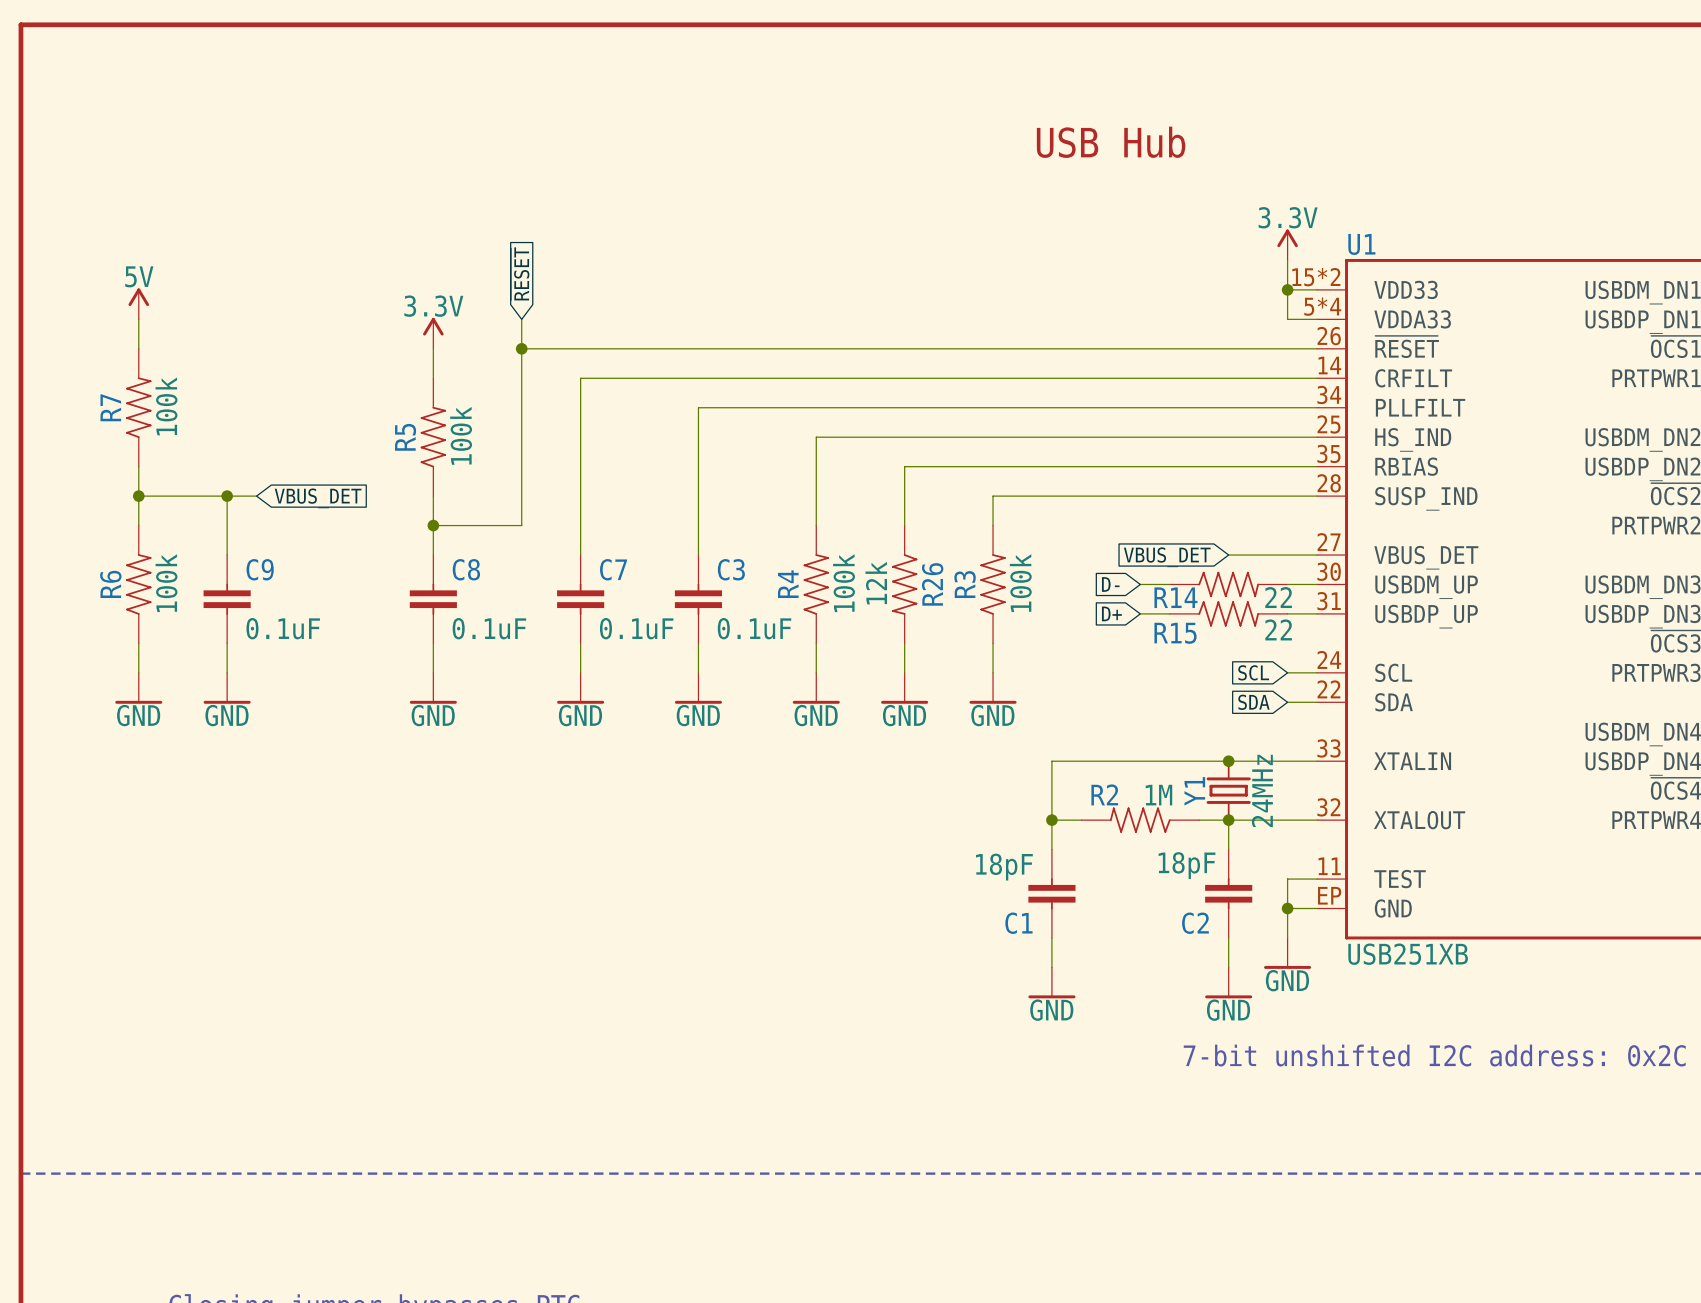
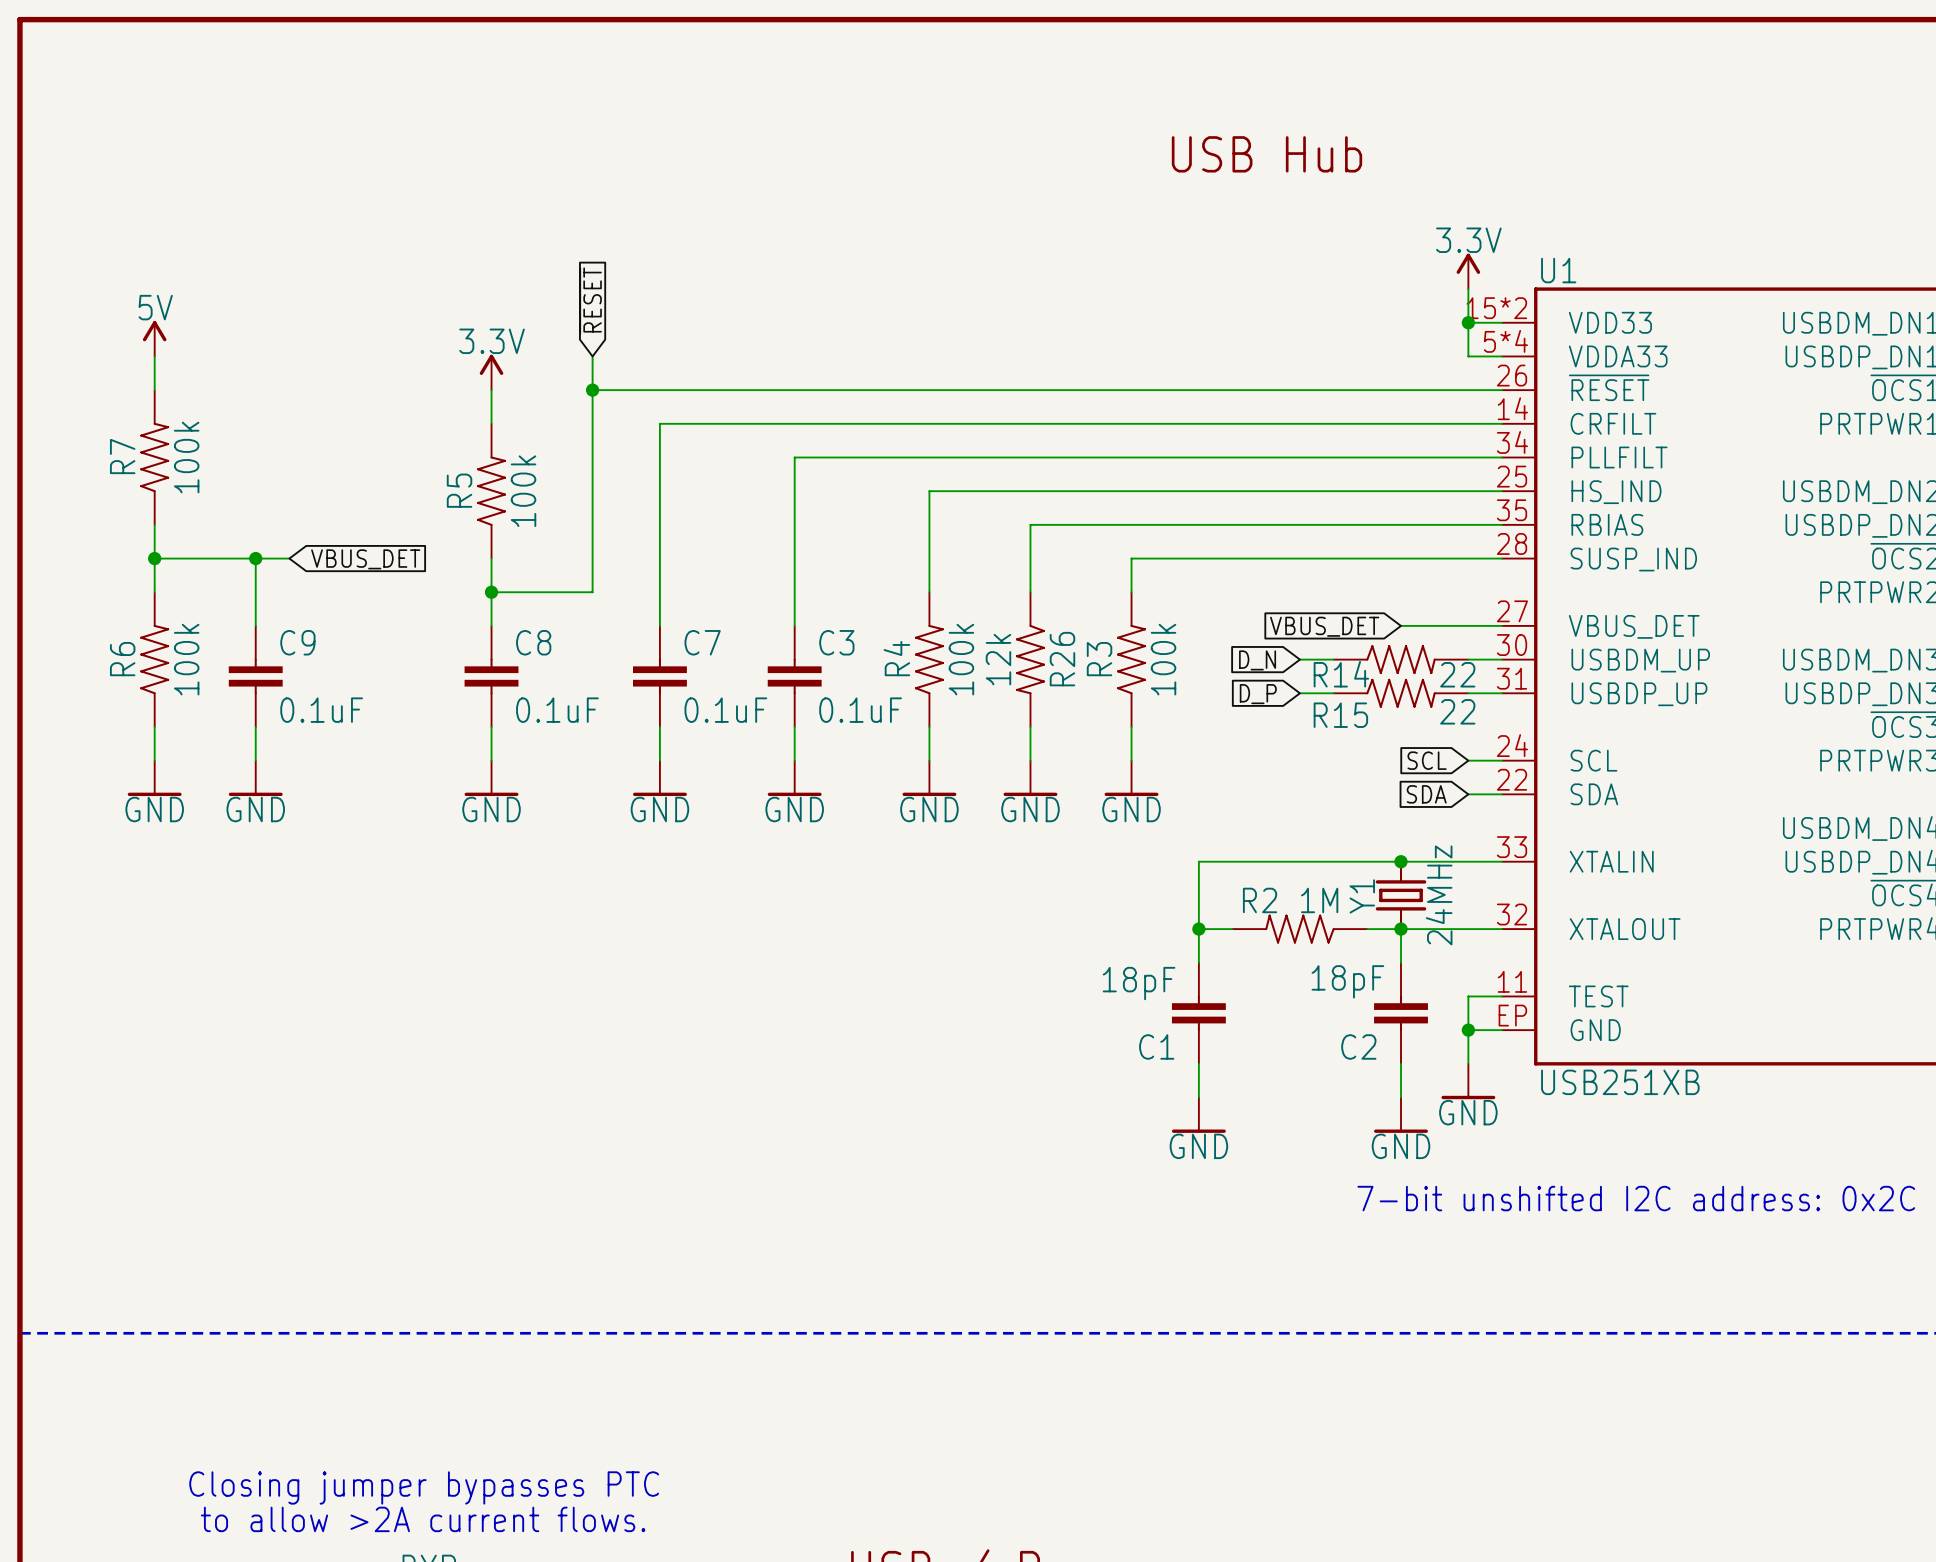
global label: D- (1110, 584) -> D_N (1257, 660)
global label: D+ (1111, 613) -> D_P (1258, 694)

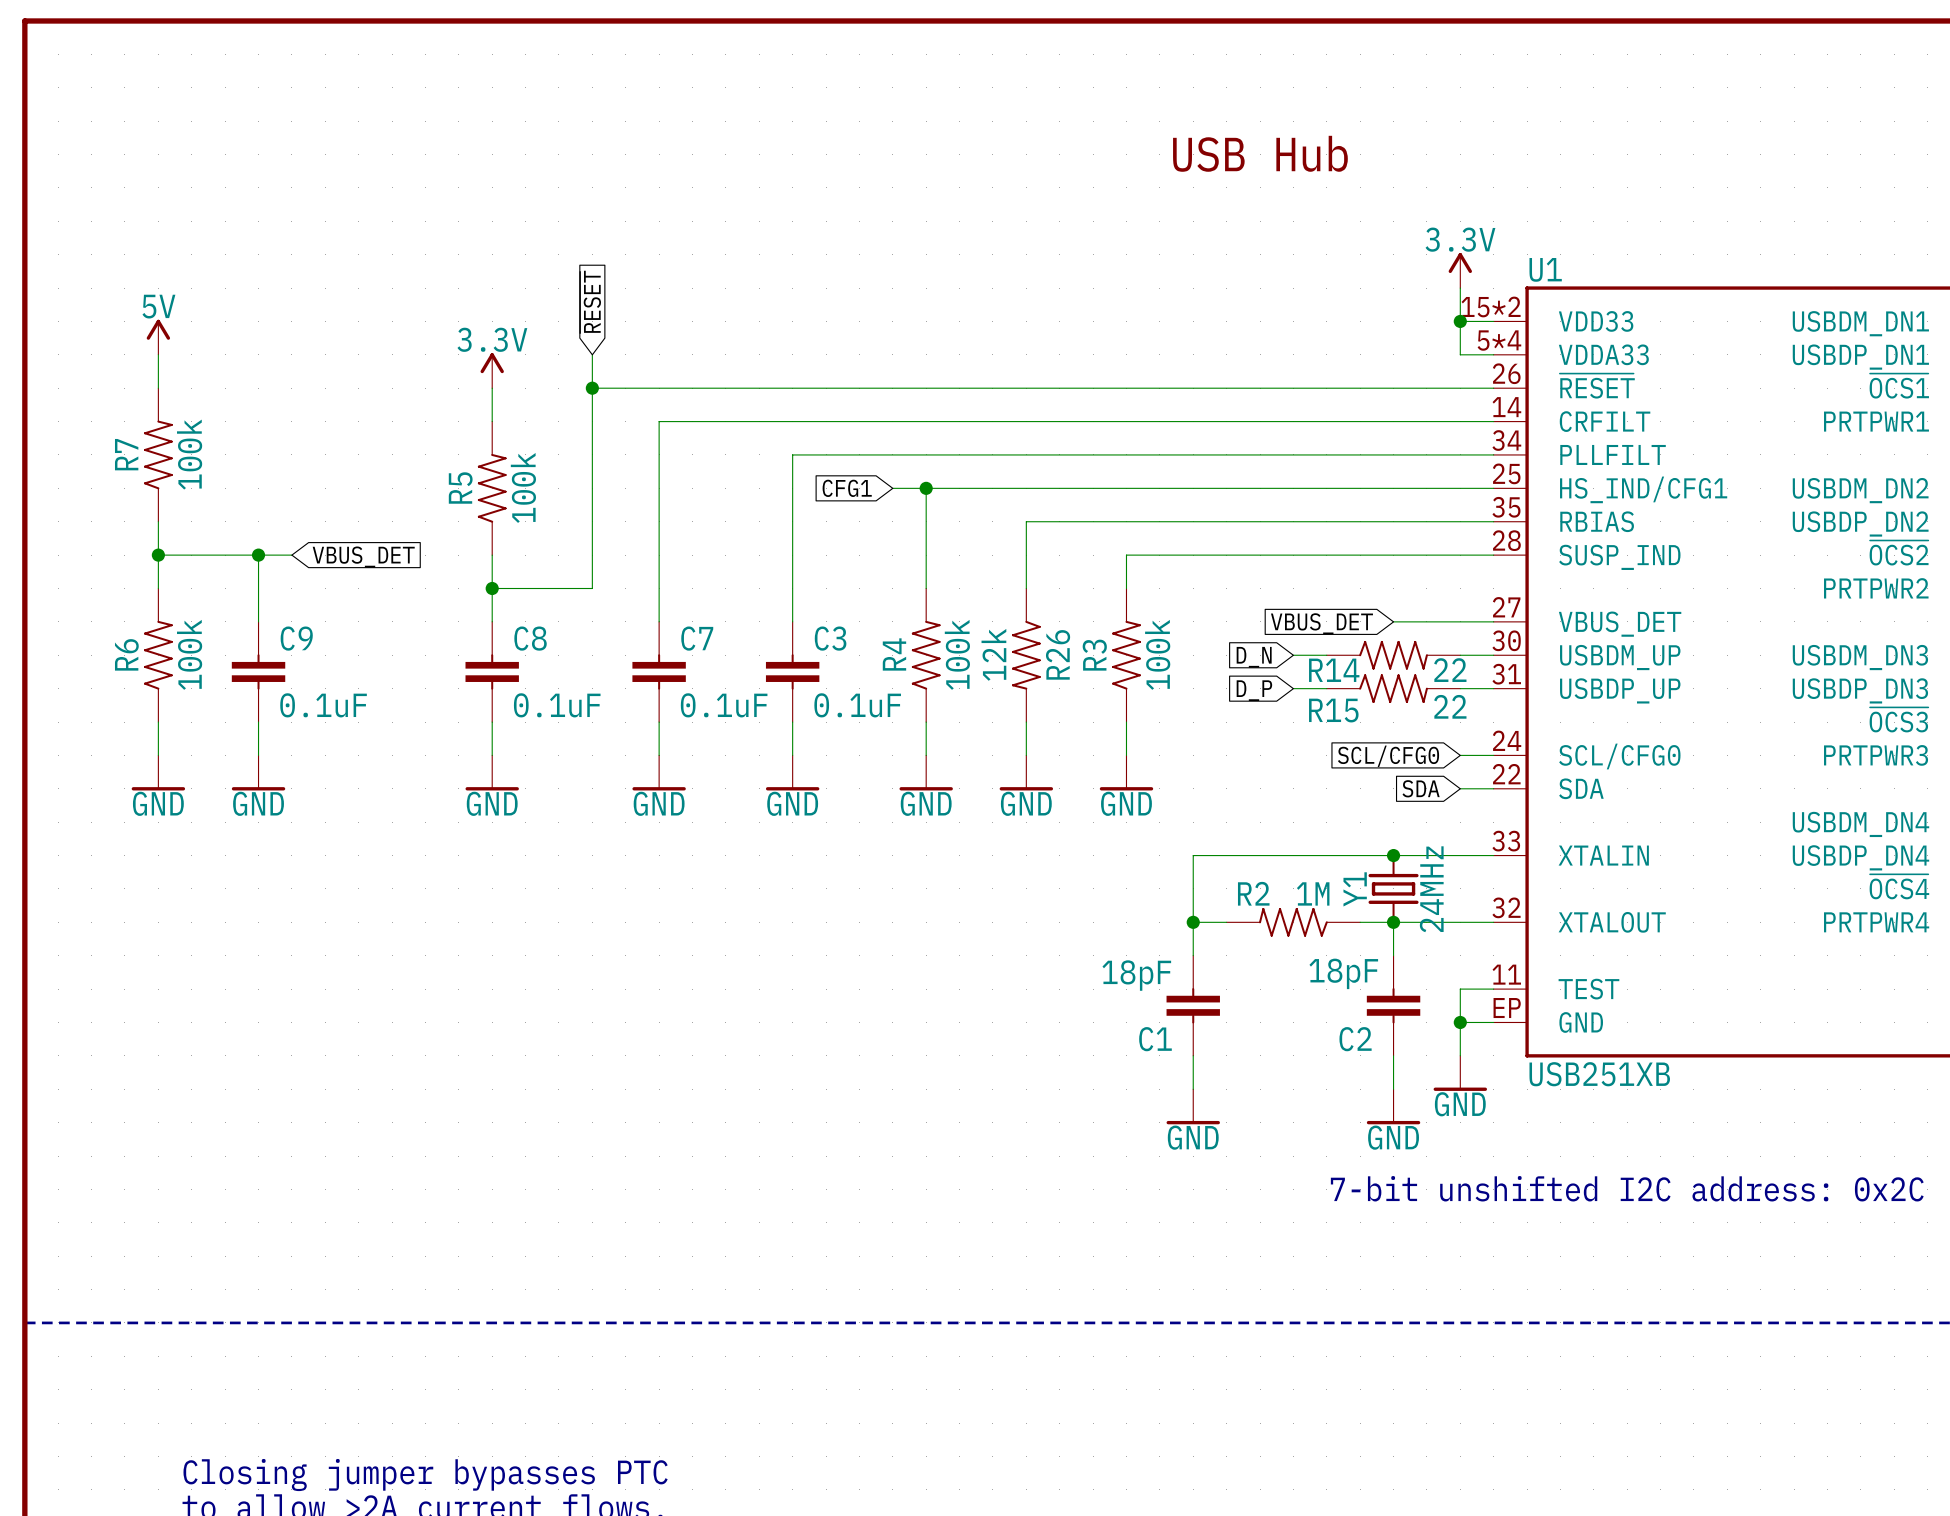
global label: none -> CFG1 (847, 488)
wire: none -> (892, 488) (926, 488)
junction: none -> (926, 488)
U1 pin name: HS_IND (1616, 492) -> HS_IND/CFG1 (1643, 489)
global label: SCL (1427, 760) -> SCL/CFG0 (1388, 756)
U1 pin name: SCL (1593, 760) -> SCL/CFG0 (1619, 756)

